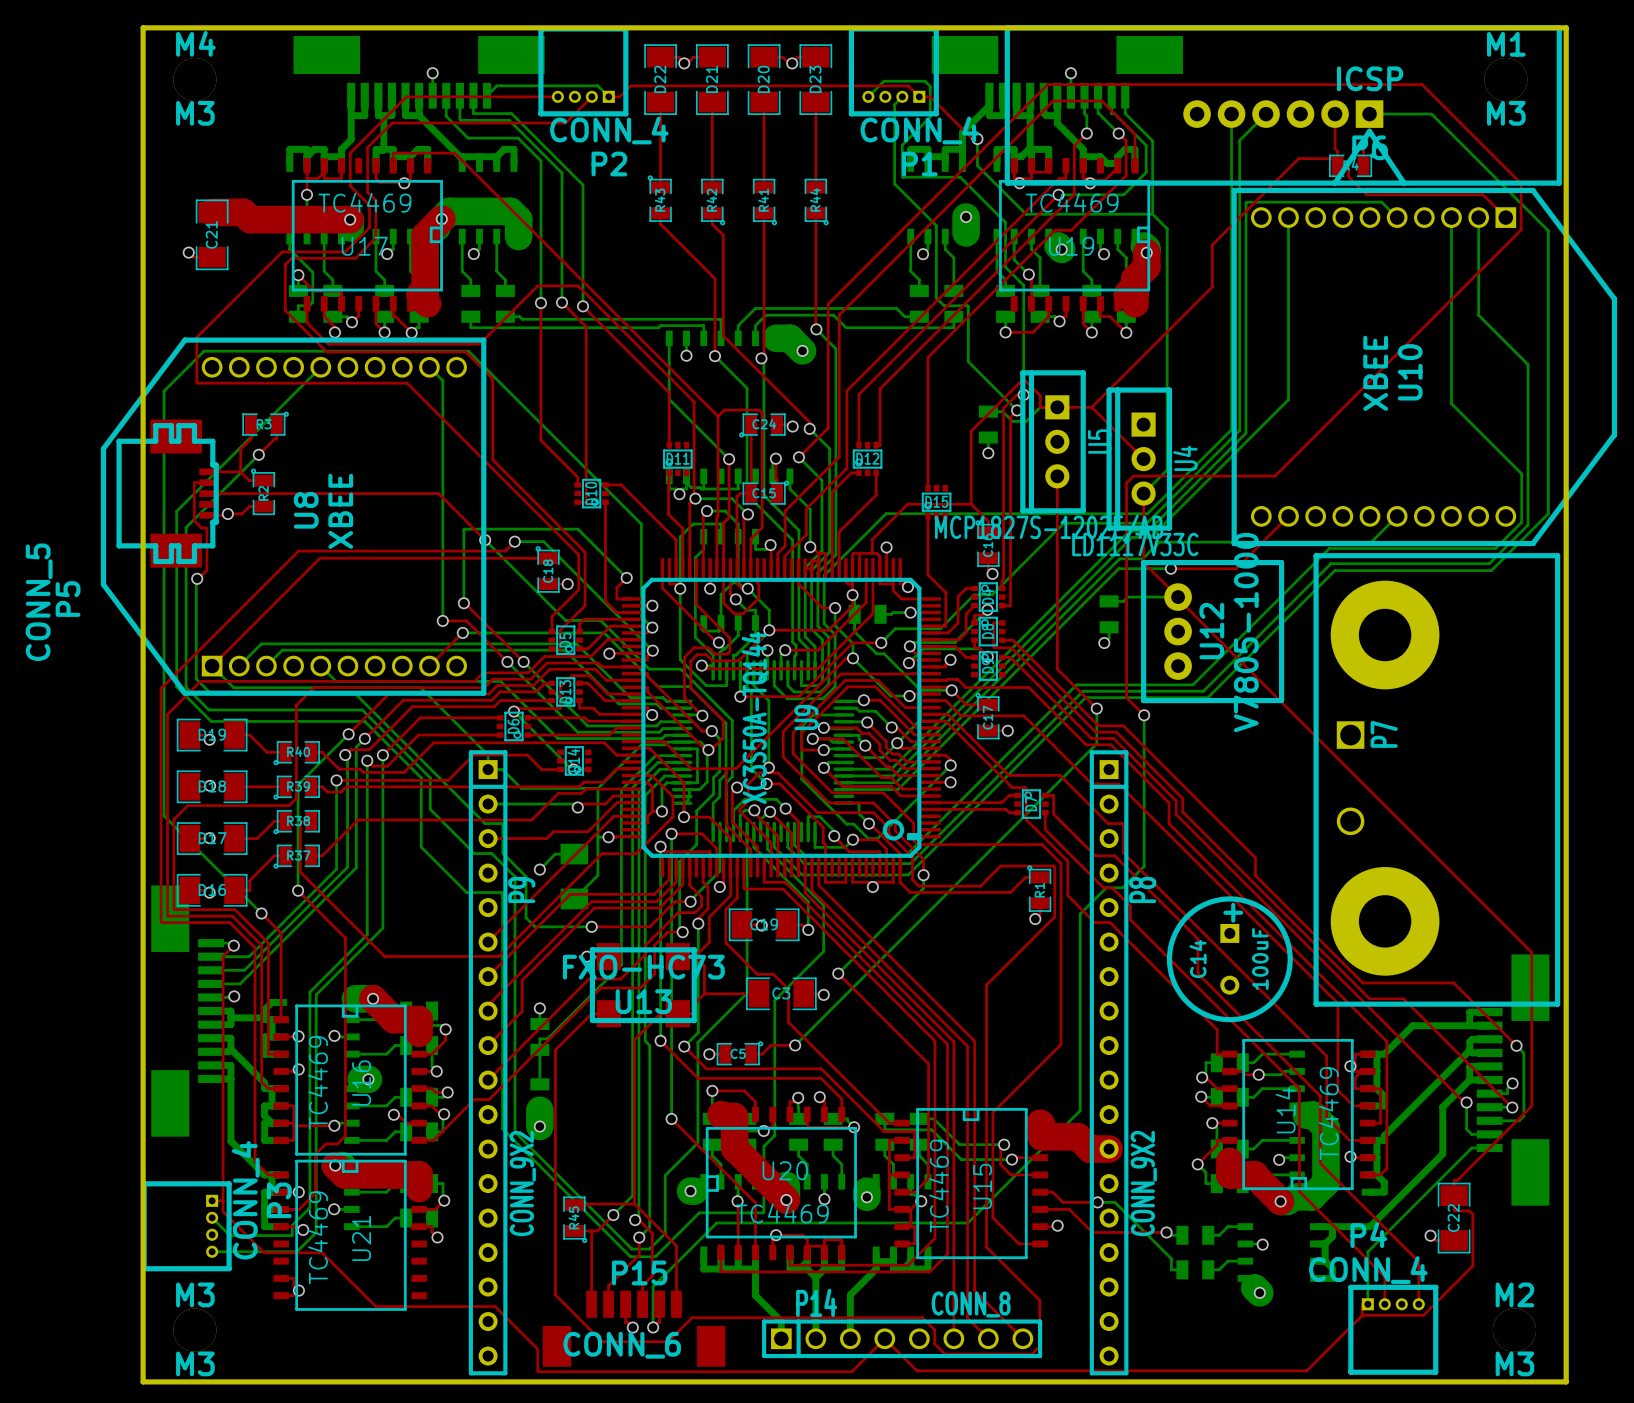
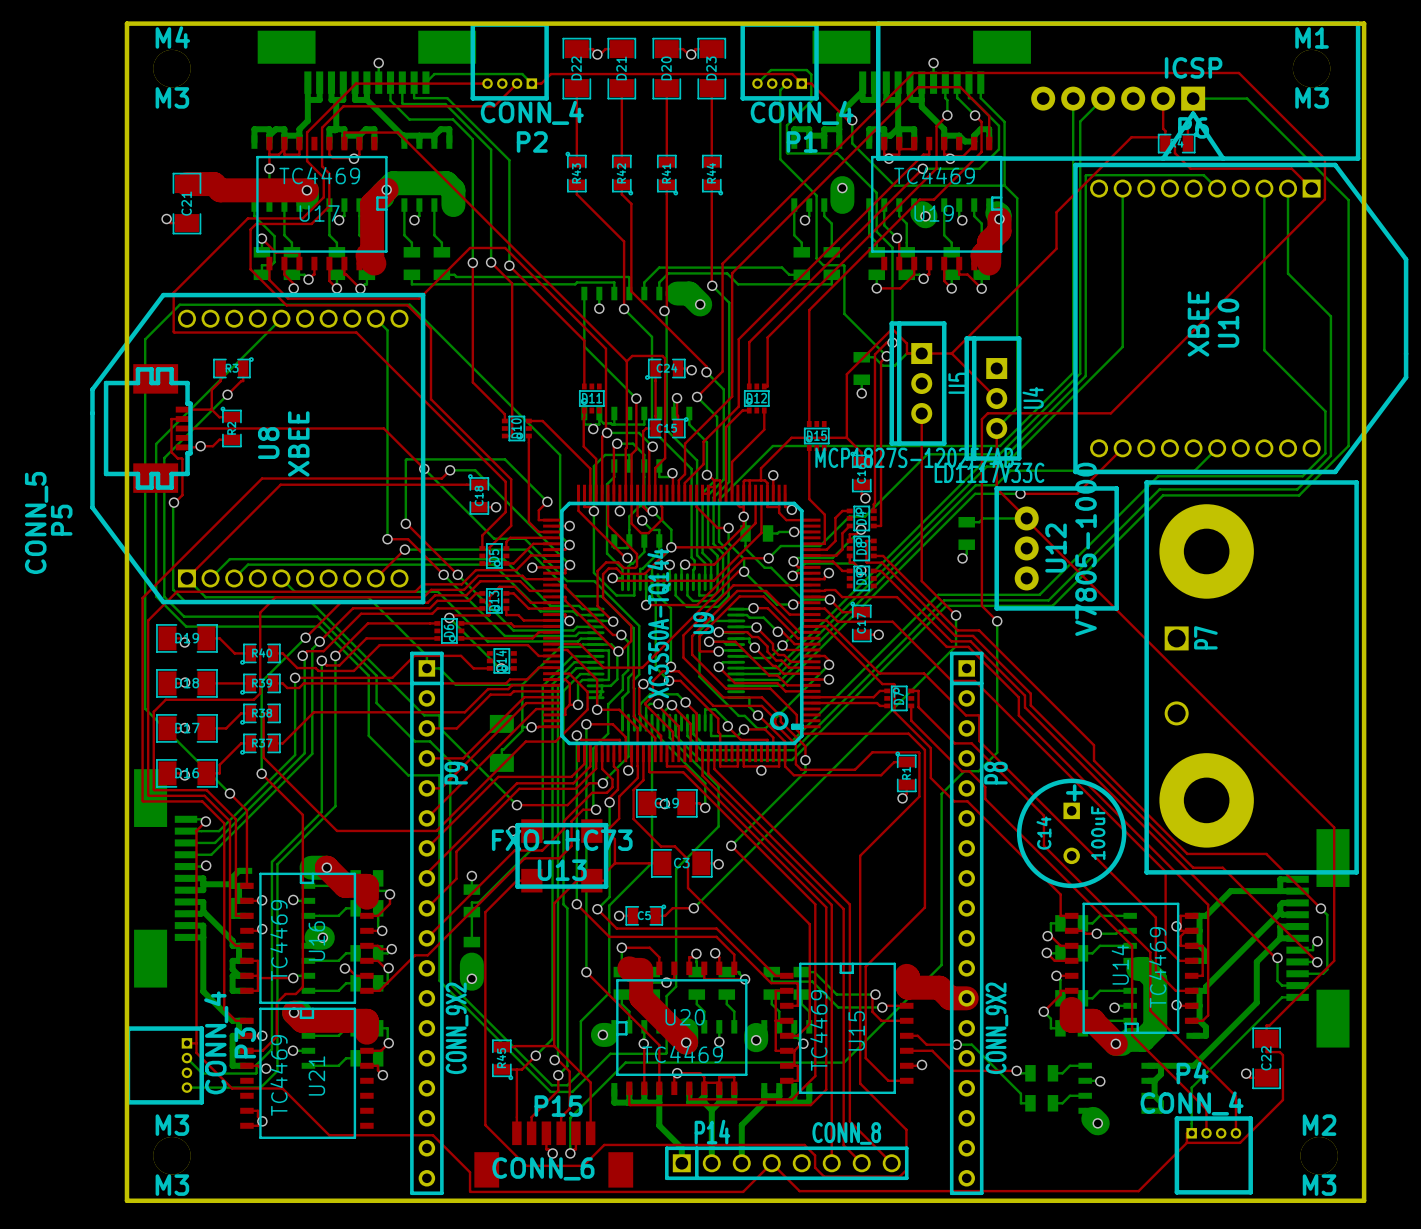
top track: (613, 795) (605, 804) (581, 804) (577, 807) -> none
top track: (617, 802) (588, 831) (553, 831) (546, 838) (522, 838) -> (535, 691) (513, 691) (510, 694) (490, 694) (456, 728)
top track: none -> (539, 697) (524, 697) (463, 758) (426, 758)
bottom track: (488, 804) (574, 804) (577, 807) -> none
via: (577, 807) -> none
top track: none -> (552, 703) (526, 703) (441, 788) (426, 788)
bottom track: (502, 837) (502, 853) (526, 876) (526, 917) (535, 926) (591, 926) -> (439, 727) (516, 805)
bottom track: (597, 841) (597, 875) (574, 898) -> (522, 730) (501, 749) (501, 762)
bottom track: (574, 854) (555, 854) (539, 869) -> none
via: (539, 869) -> none
part position: (574, 876) -> (501, 743)

